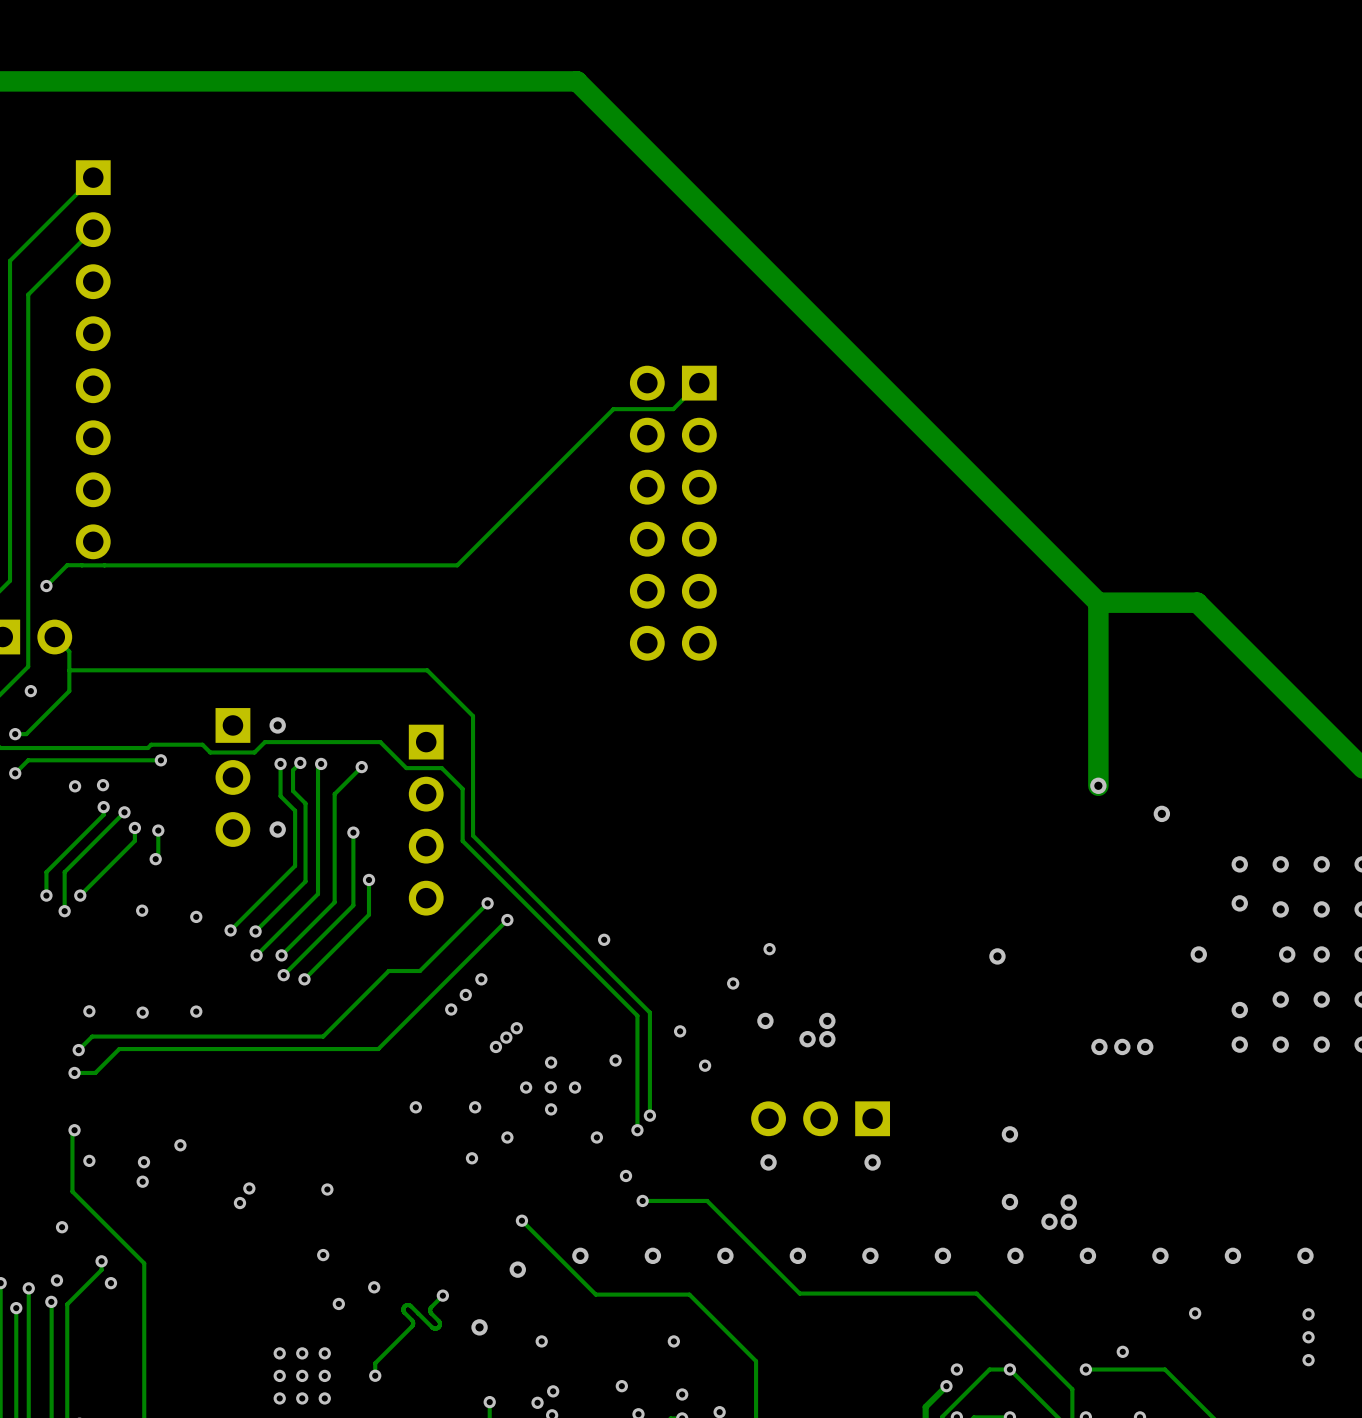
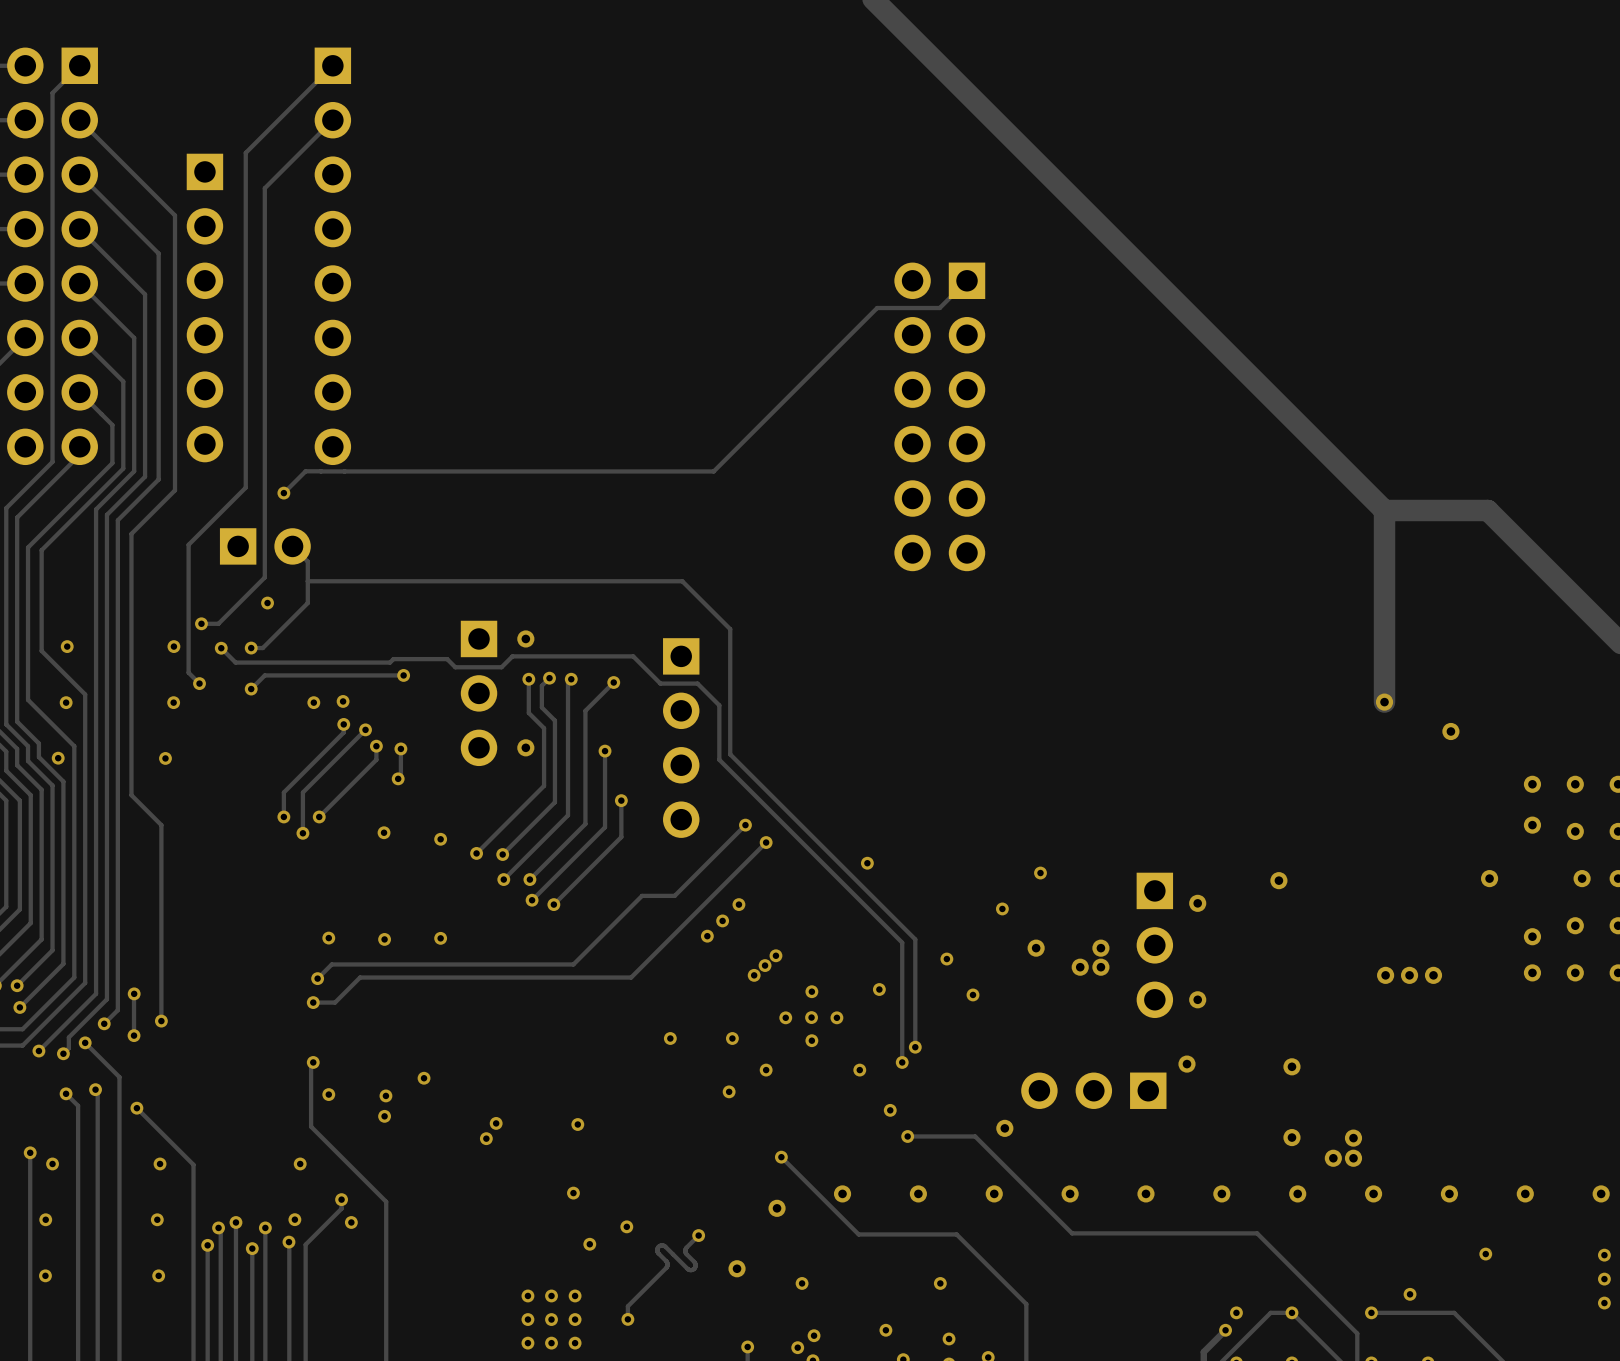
via: none -> (1197, 903)
part: none -> (1154, 945)
via: none -> (1197, 999)
part position: (820, 1118) -> (1093, 1090)
via position: (768, 1162) -> (1004, 1128)
via position: (872, 1162) -> (1186, 1064)

